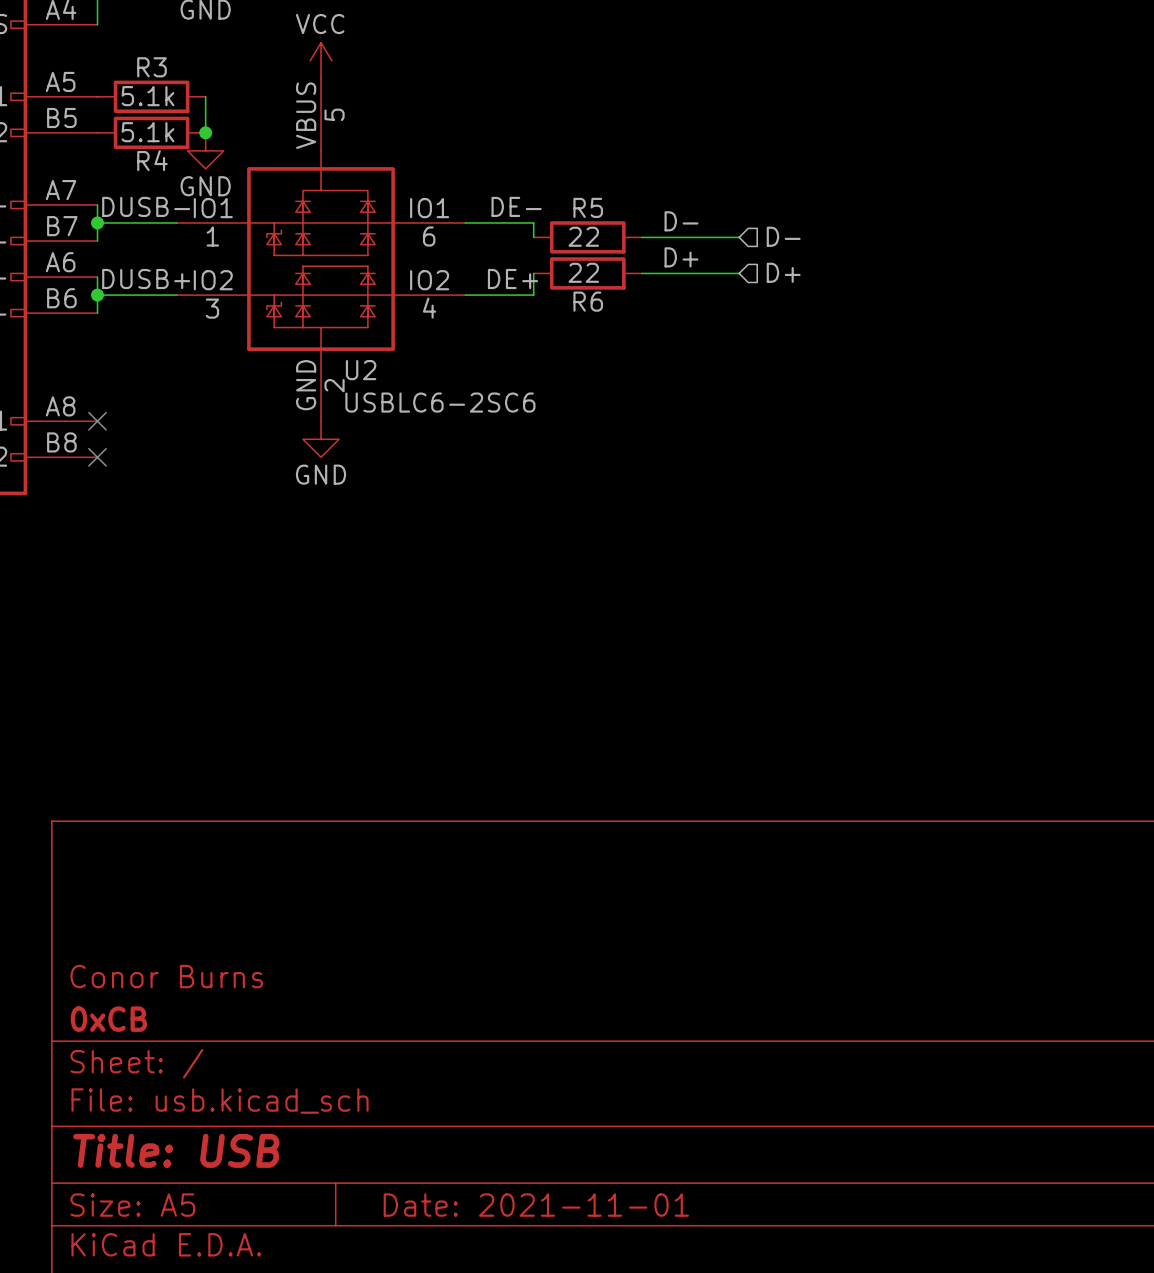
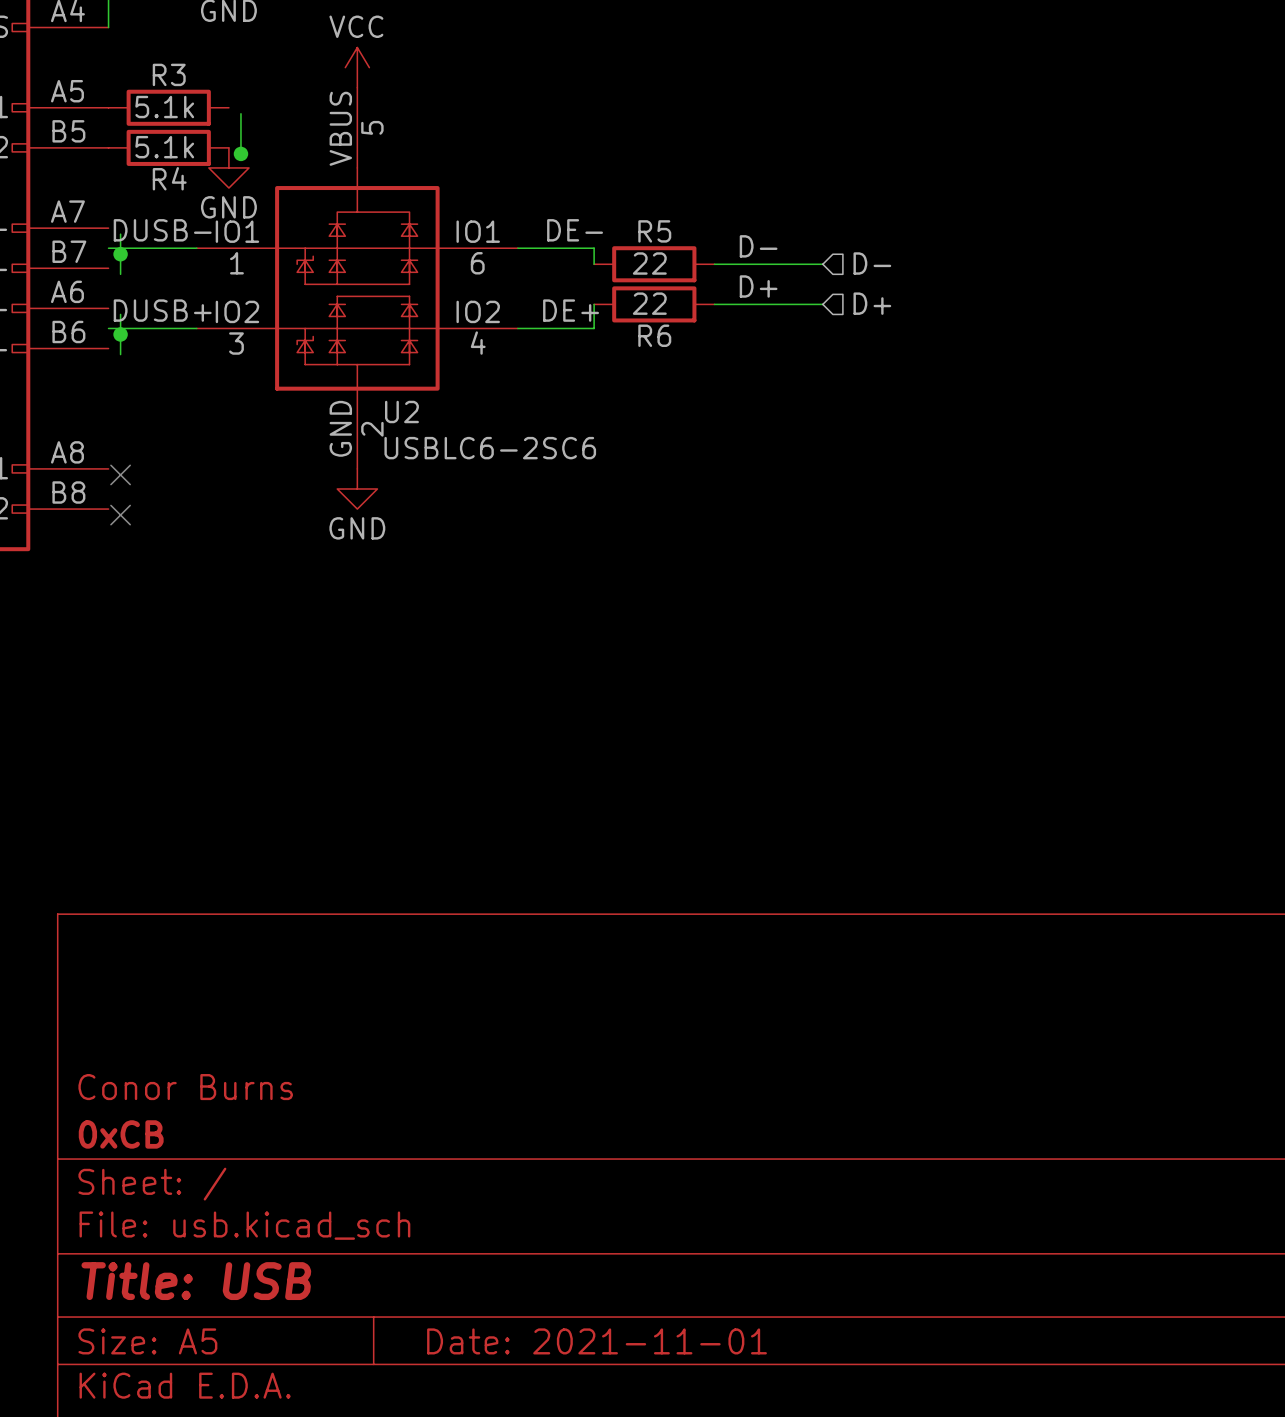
wire: (205, 96) (205, 132) -> (240, 113) (240, 153)
junction position: (205, 132) -> (240, 153)
wire: (97, 204) (97, 241) -> (120, 234) (120, 274)
junction position: (97, 222) -> (120, 254)
wire: (97, 277) (97, 313) -> (120, 314) (120, 354)
junction position: (97, 295) -> (120, 334)
no-connect mark position: (97, 421) -> (120, 474)
no-connect mark position: (97, 457) -> (120, 515)

